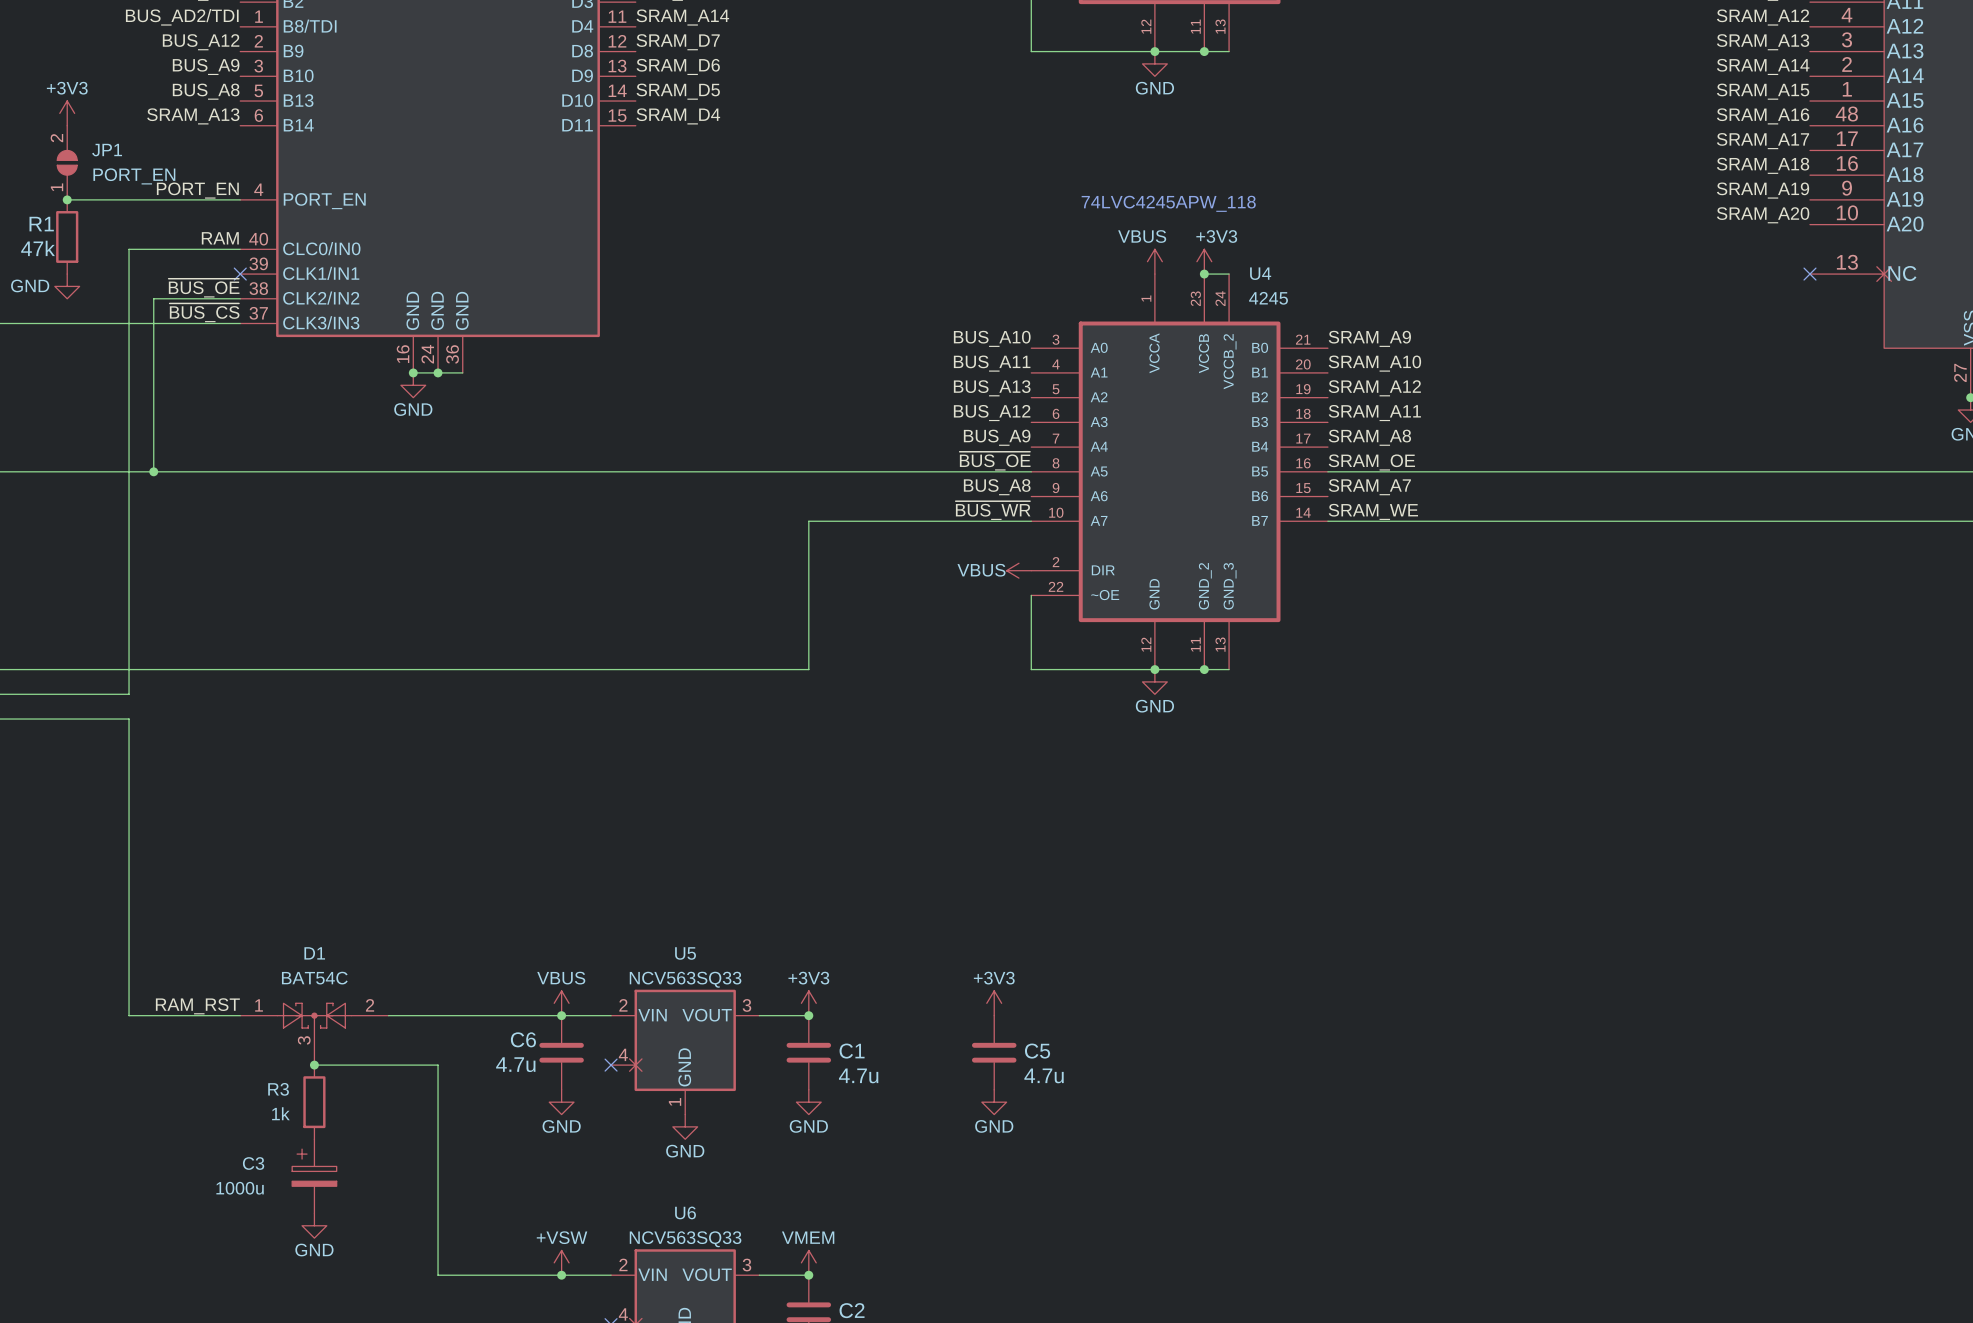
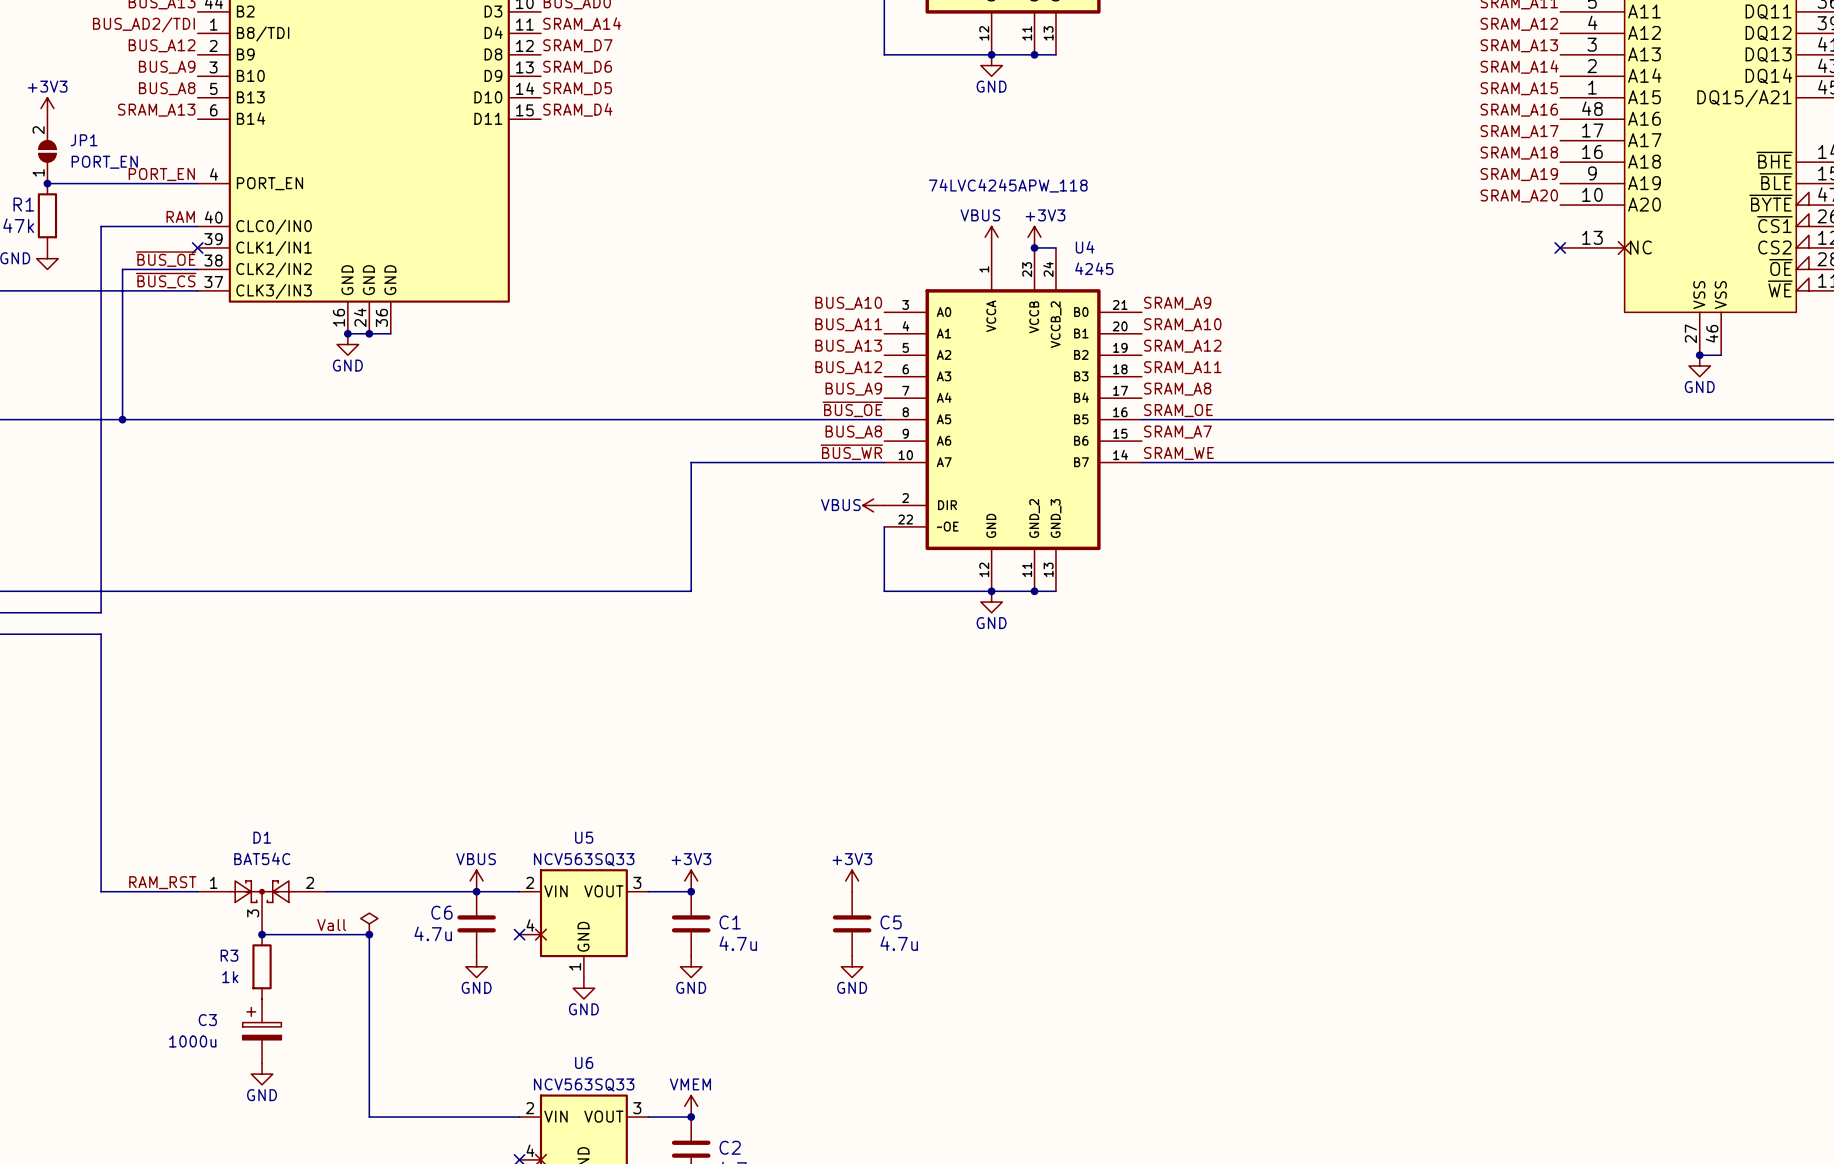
power symbol: none -> (369, 923)
label: none -> Vall (331, 925)
junction: none -> (369, 934)
power symbol: +VSW (561, 1262) -> none
junction: (561, 1275) -> none

